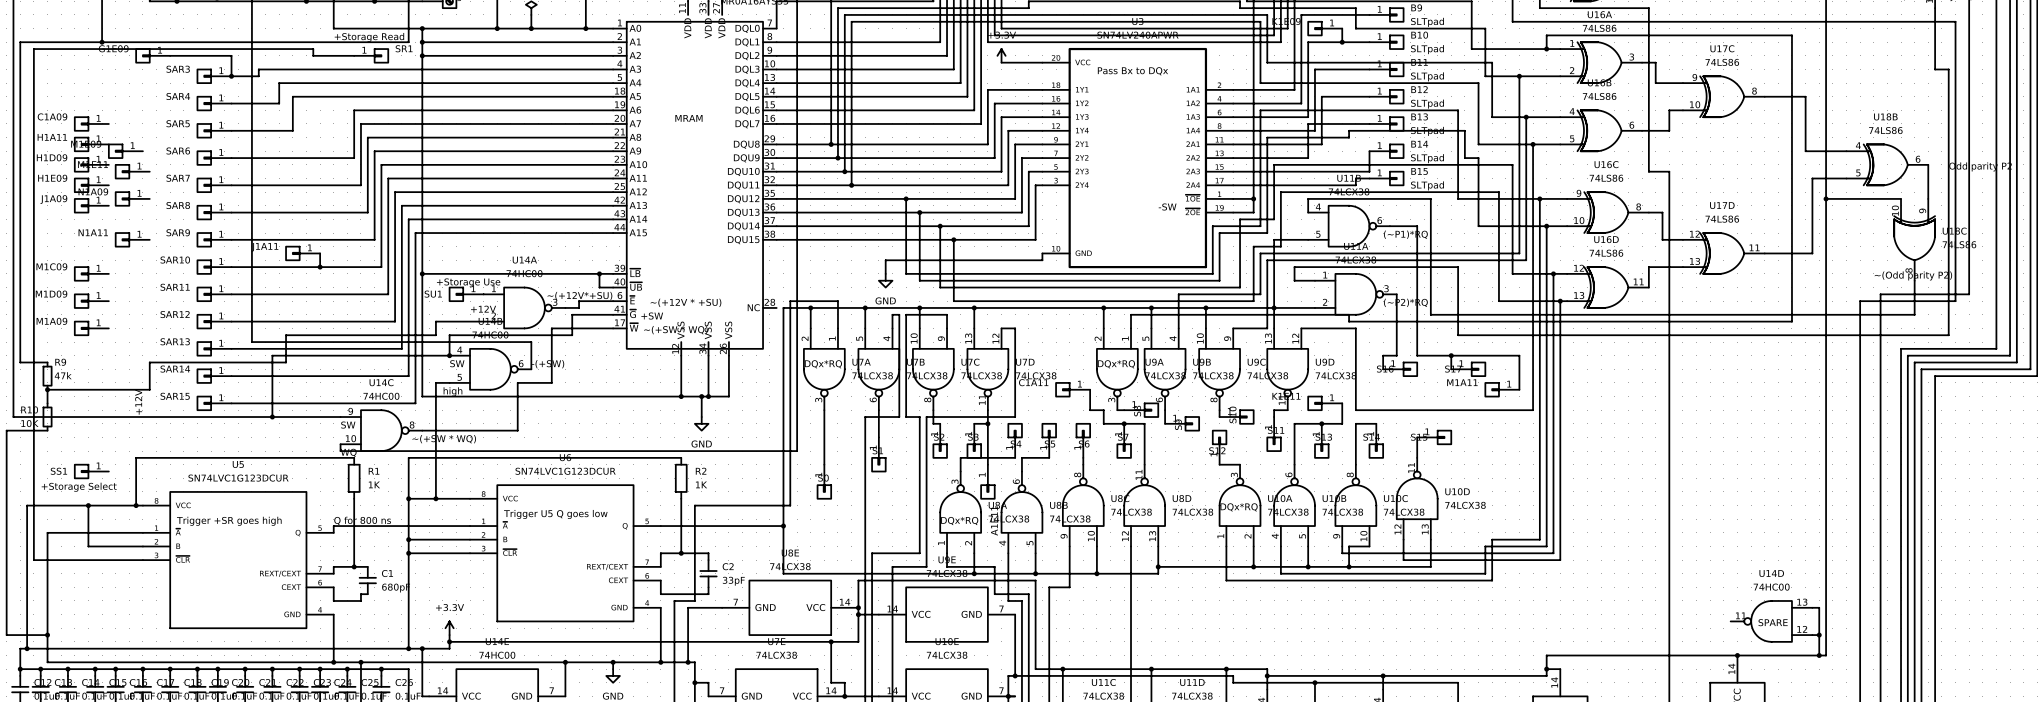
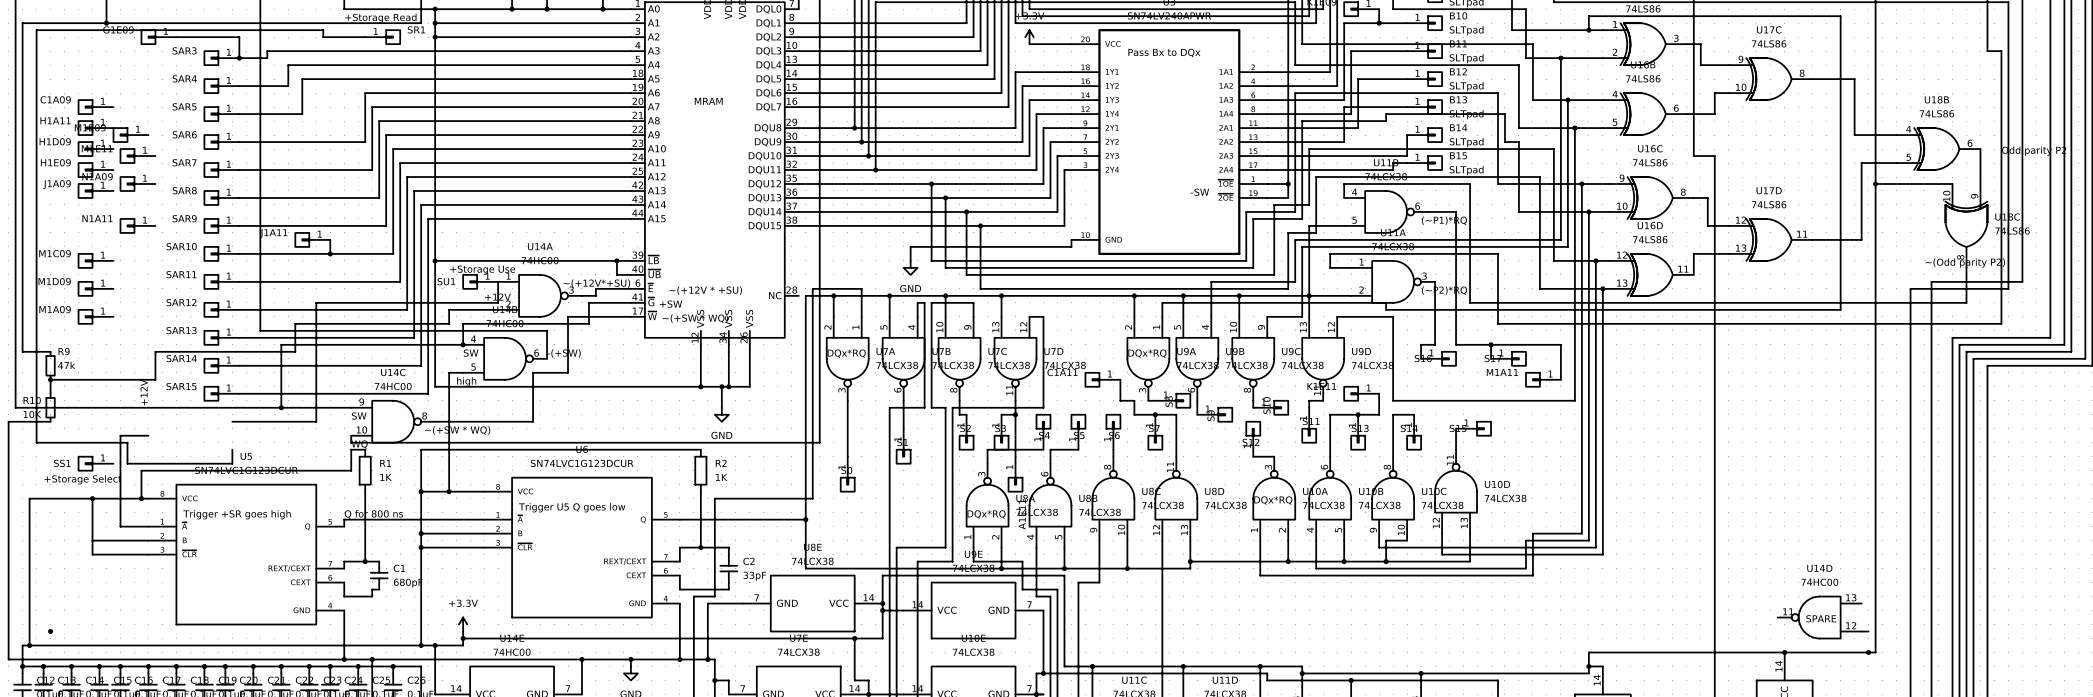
wire: none -> (498, 281) (498, 302) (316, 302) (316, 421) (232, 421)
wire: (33, 451) (33, 560) (88, 560) -> (92, 540) (92, 554)
wire: none -> (36, 442) (127, 442) (127, 463) (232, 463) (232, 449)
wire: (340, 457) (136, 457) (136, 478) -> (351, 449) (351, 470) (141, 470)
wire: (115, 532) (47, 532) (47, 662) -> (120, 526) (120, 435) (148, 435)
wire: (1812, 607) (1819, 607) (1819, 655) -> none
wire: (6, 635) (47, 635) -> (8, 631) (8, 659) (50, 659)
junction: (1819, 635) -> none

